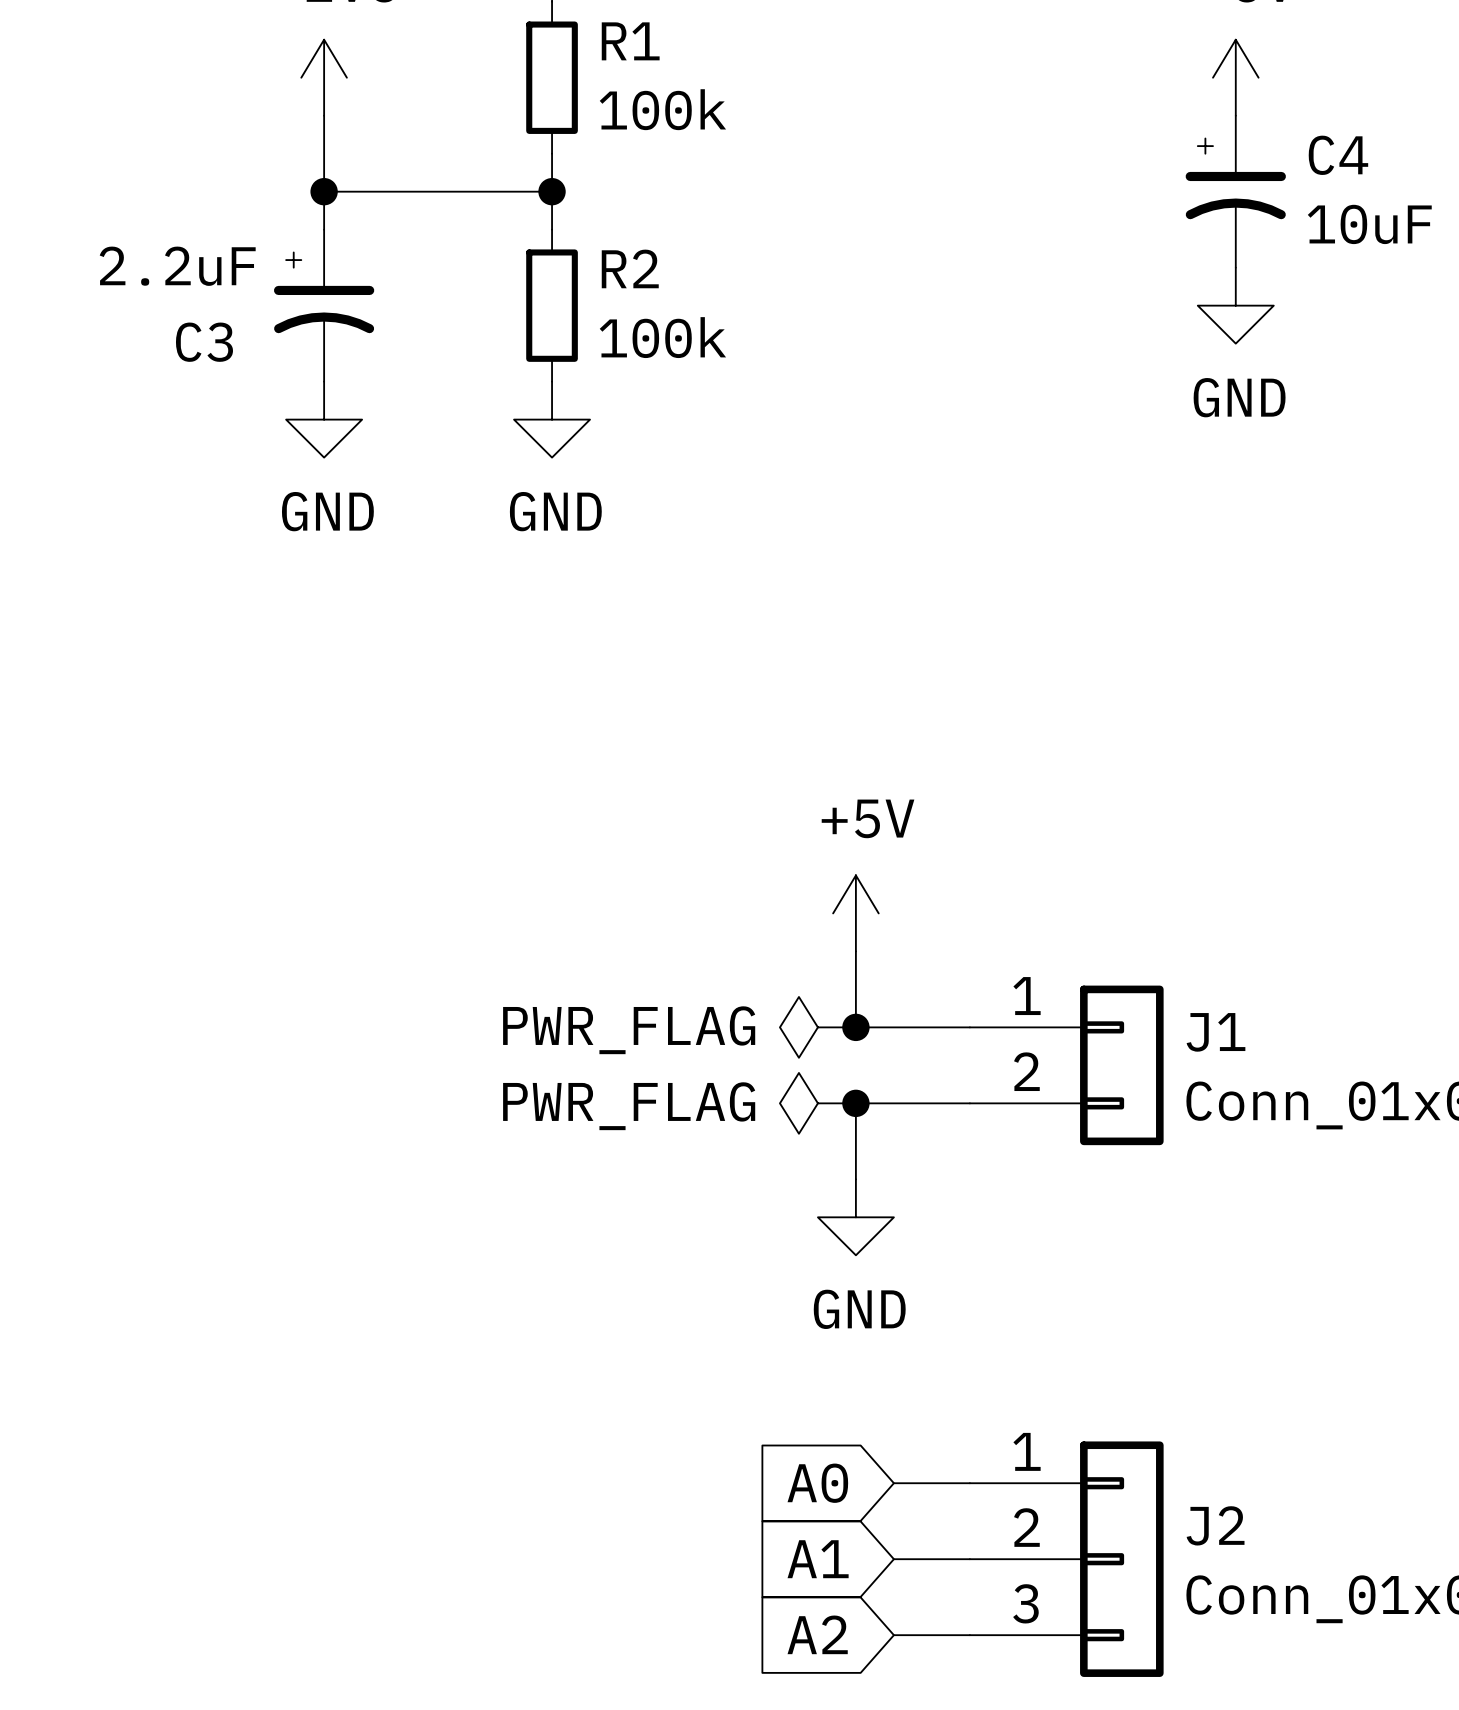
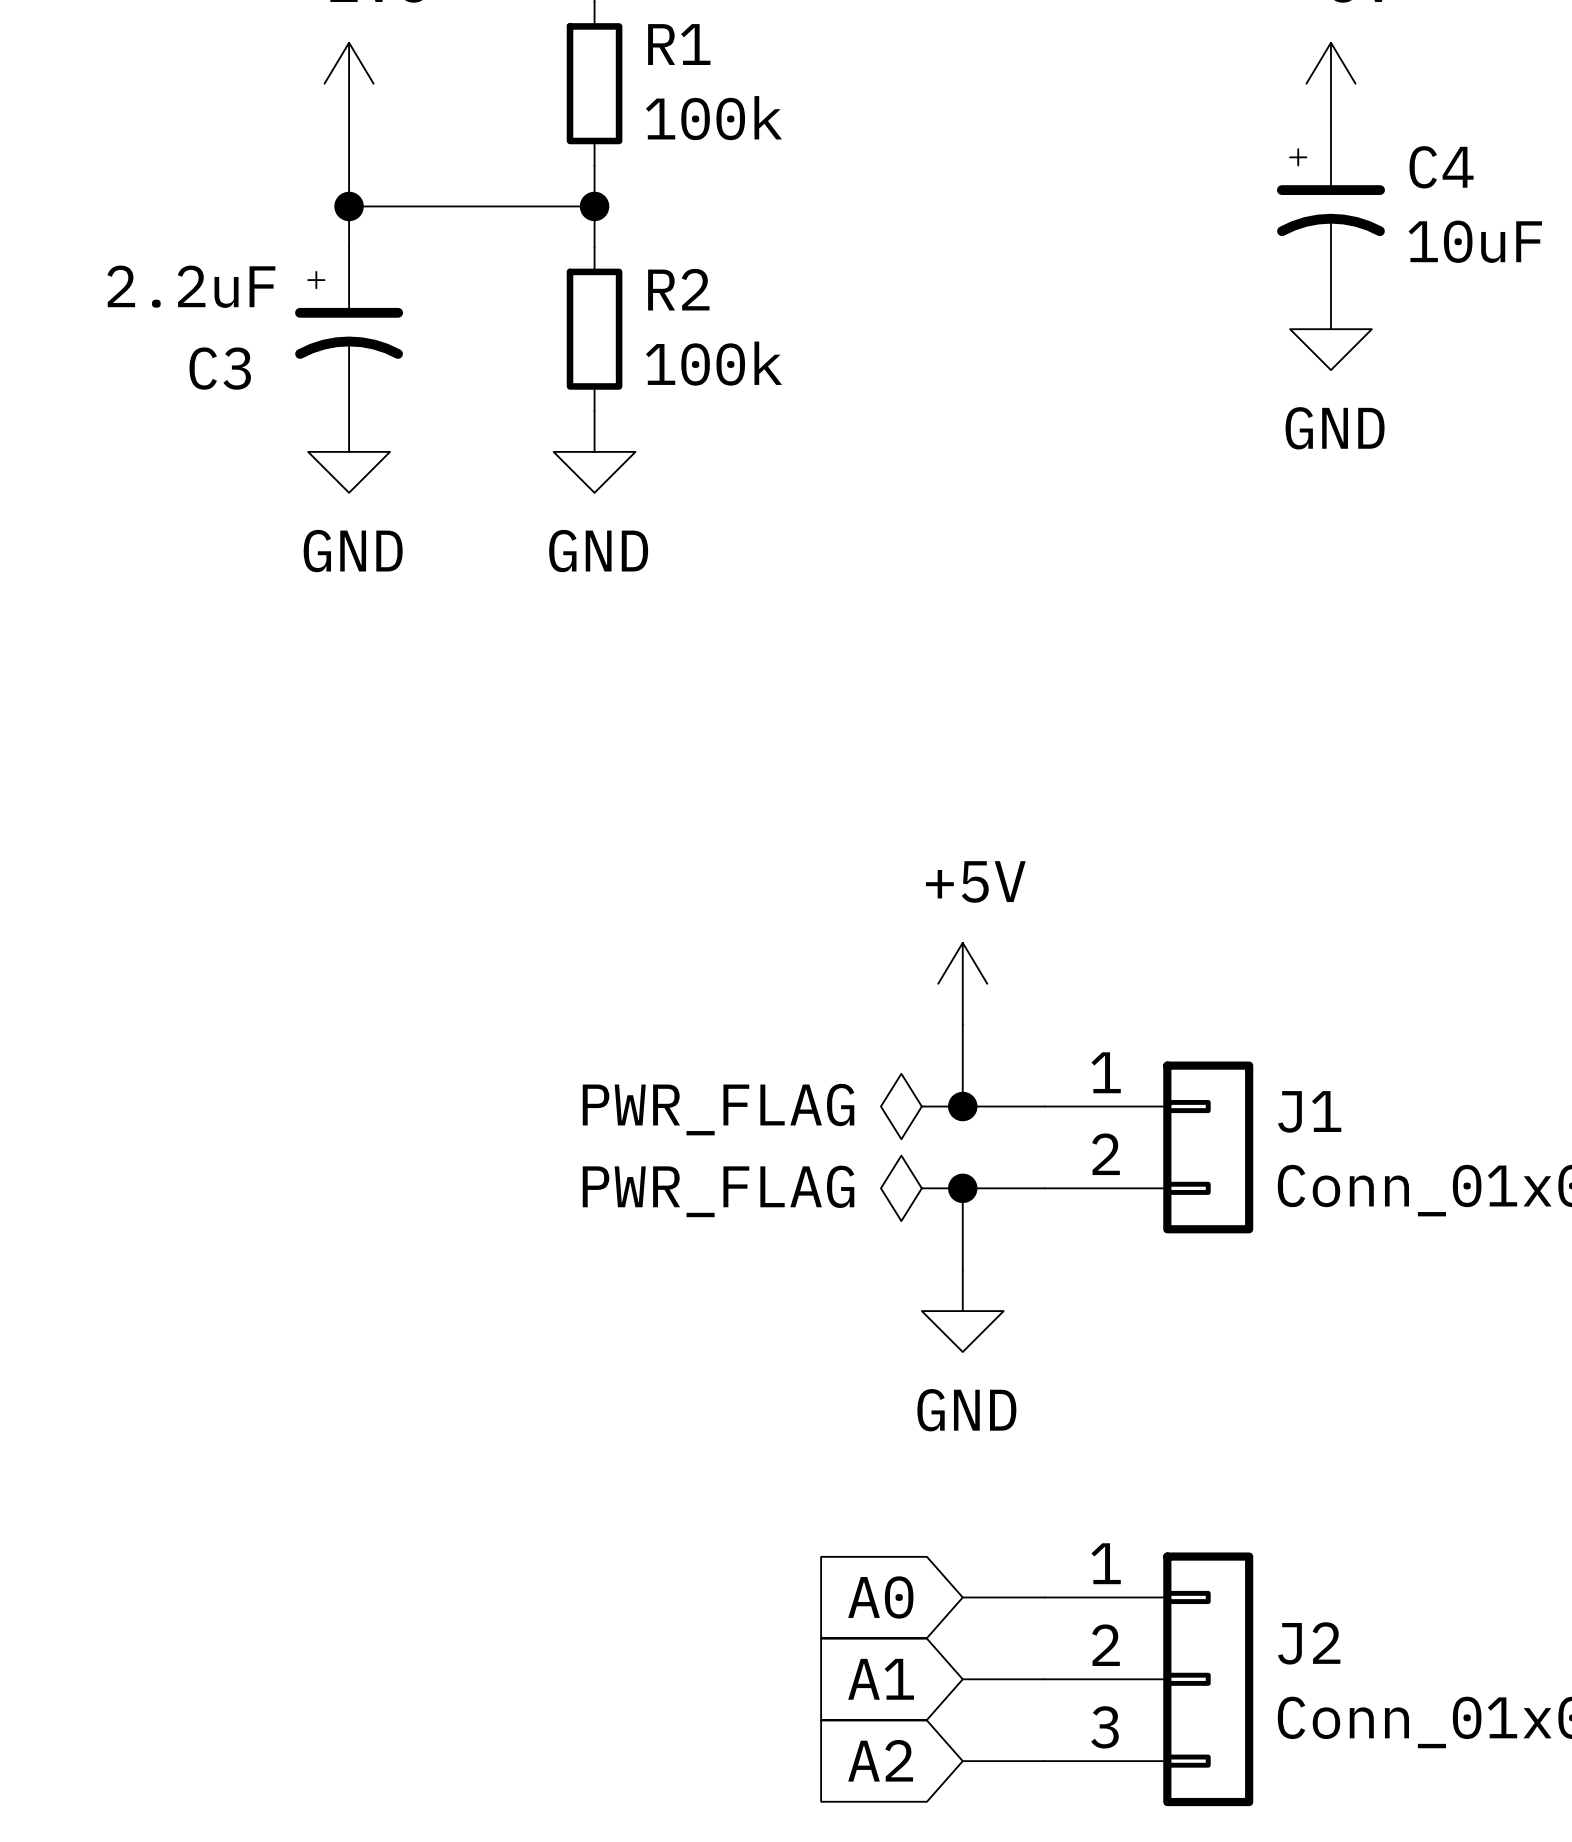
power symbol position: +5V (855, 913) -> +5V (962, 983)
wire: (855, 951) (855, 1027) (893, 1027) -> (962, 1024) (962, 1106)
power symbol position: PWR_FLAG (817, 1027) -> PWR_FLAG (921, 1106)
junction position: (855, 1027) -> (962, 1106)
power symbol position: PWR_FLAG (817, 1103) -> PWR_FLAG (921, 1188)
junction position: (855, 1103) -> (962, 1188)
wire: (893, 1103) (855, 1103) (855, 1179) -> (962, 1188) (962, 1270)
power symbol position: GND (855, 1217) -> GND (962, 1311)

